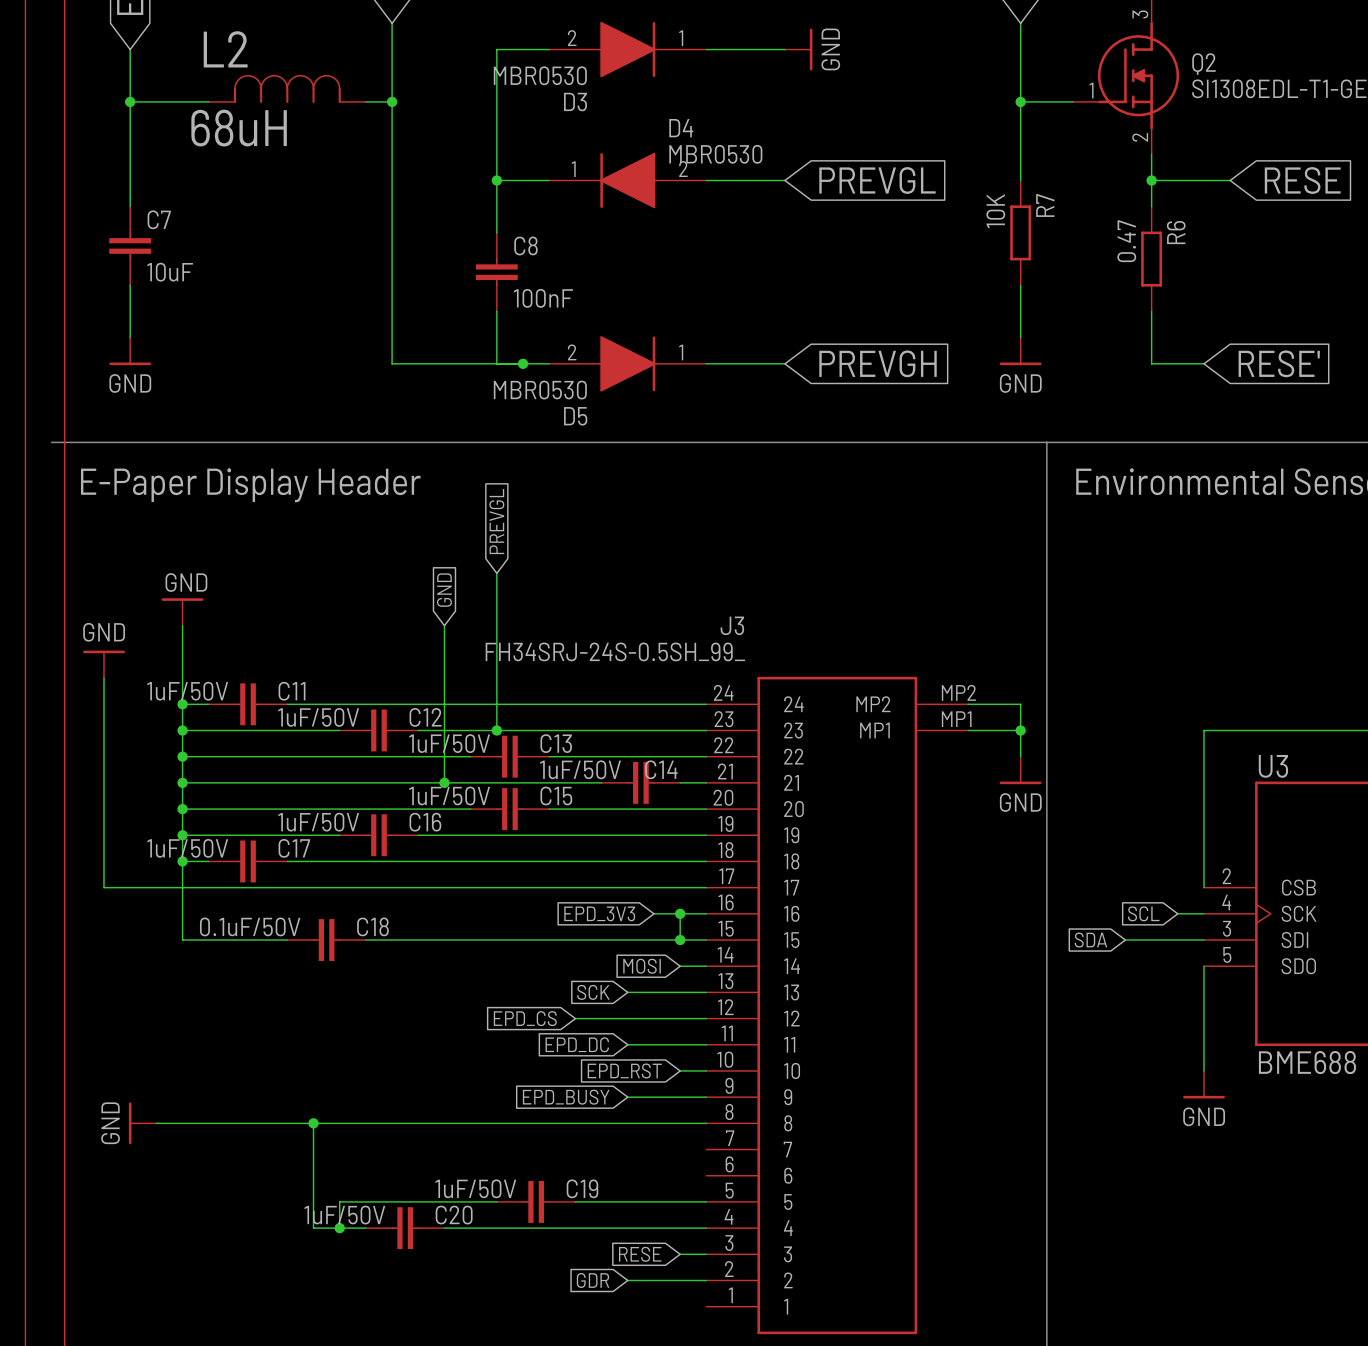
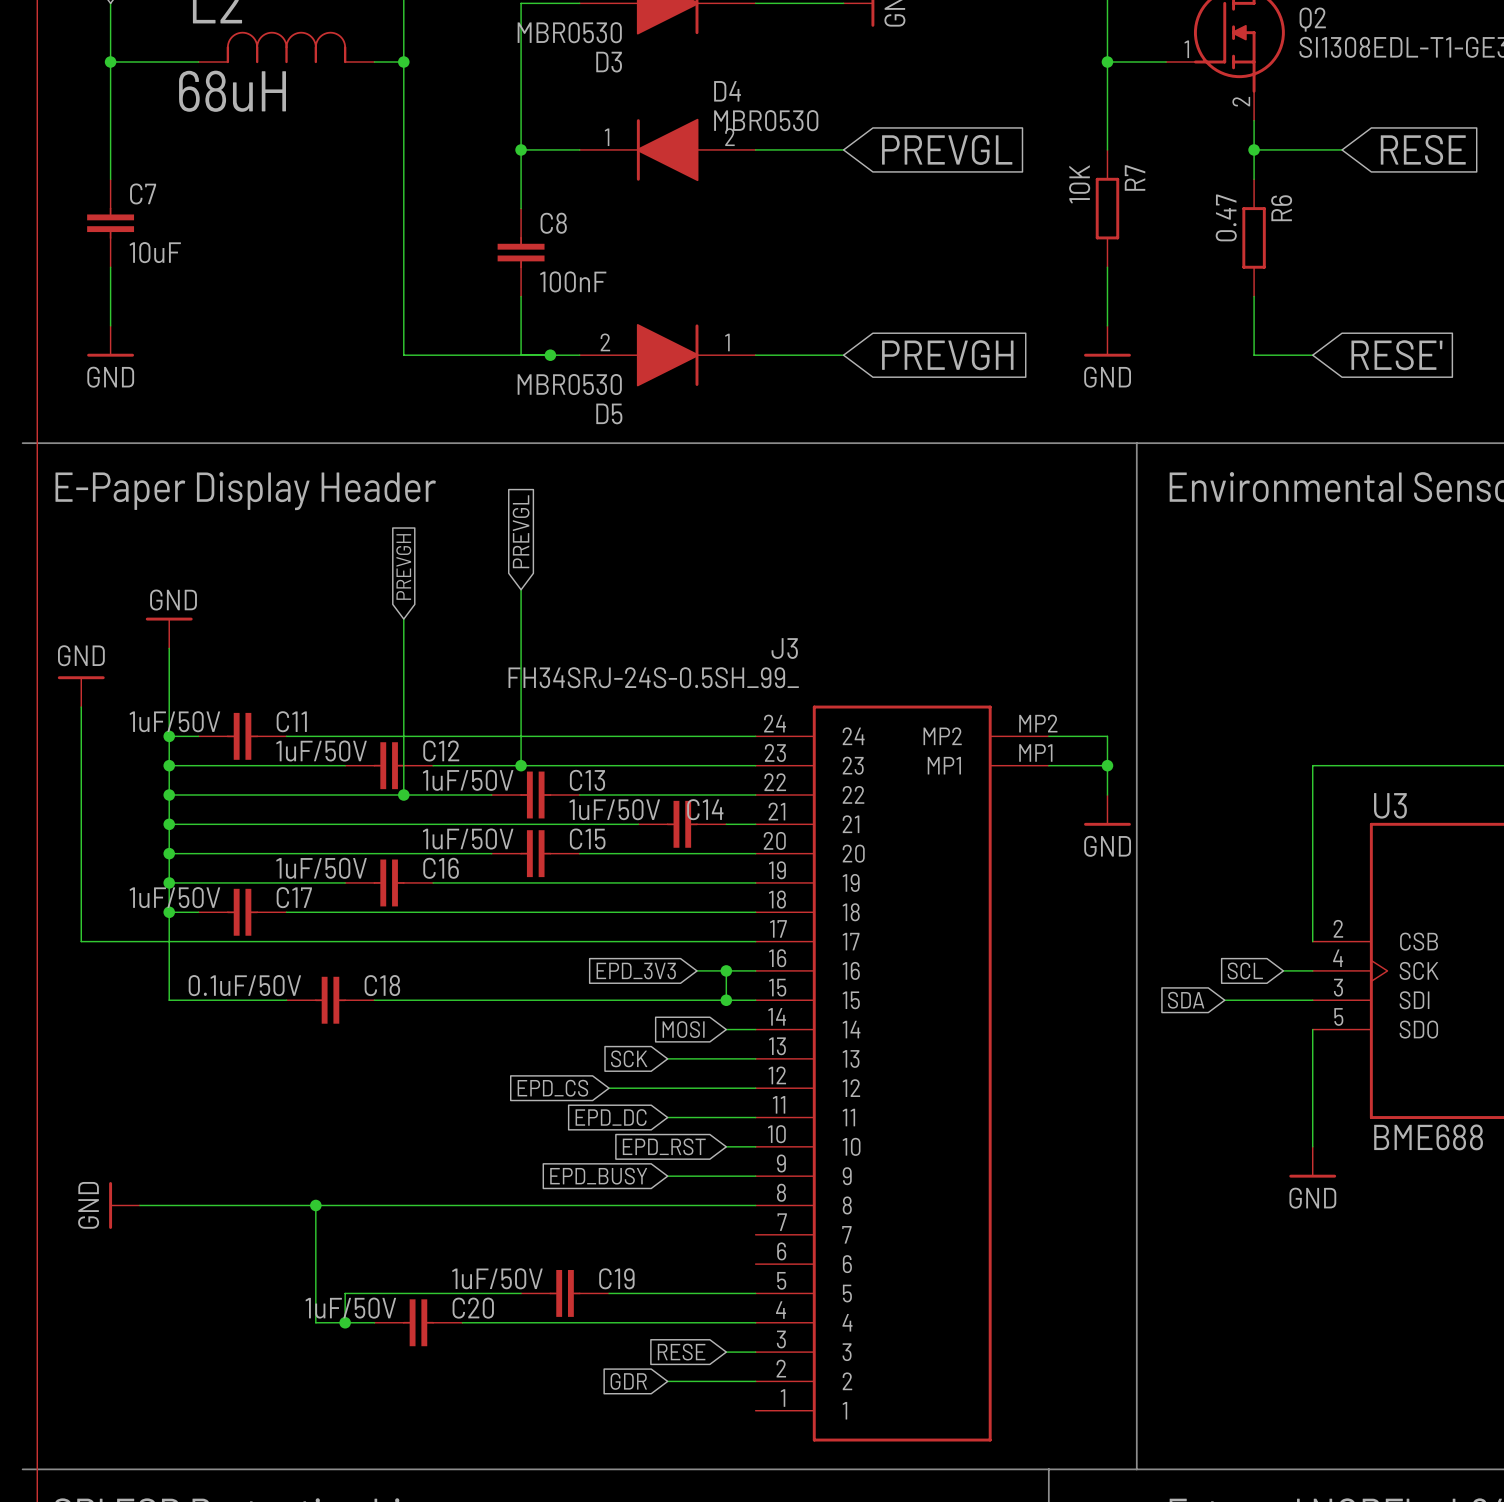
global label: none -> PREVGH (403, 566)
global label: GND (444, 590) -> none
wire: (444, 625) (444, 782) -> (403, 619) (403, 795)
junction position: (444, 782) -> (403, 795)

